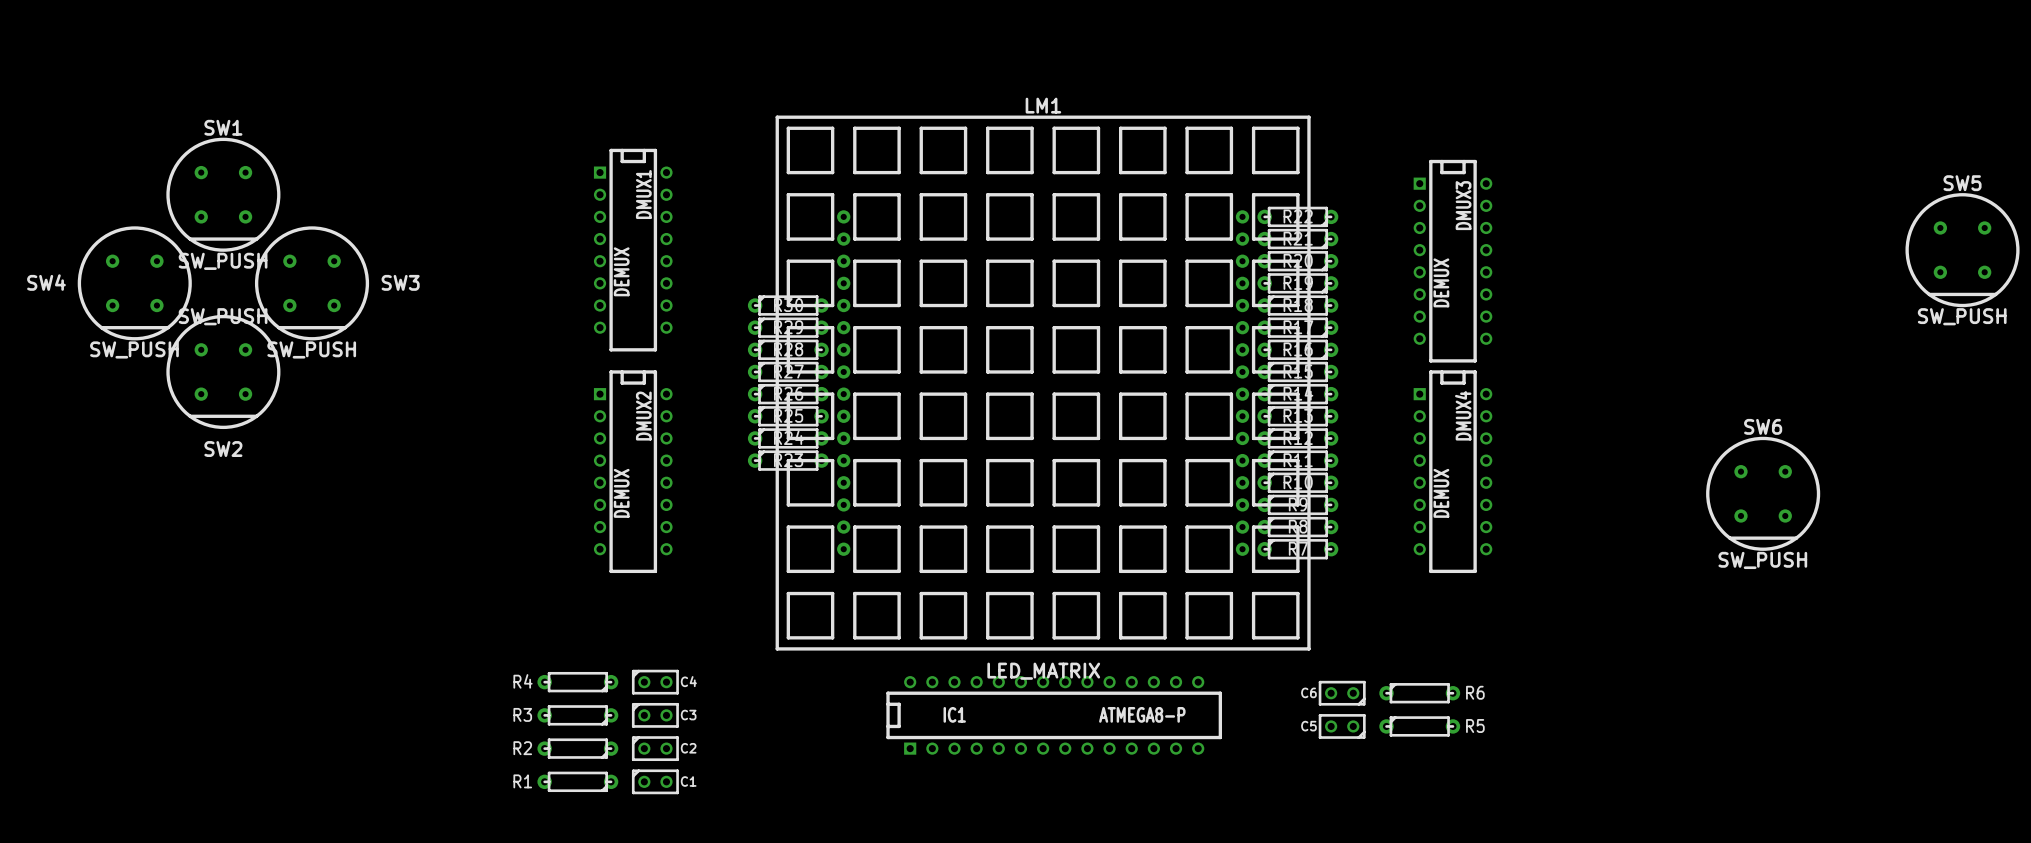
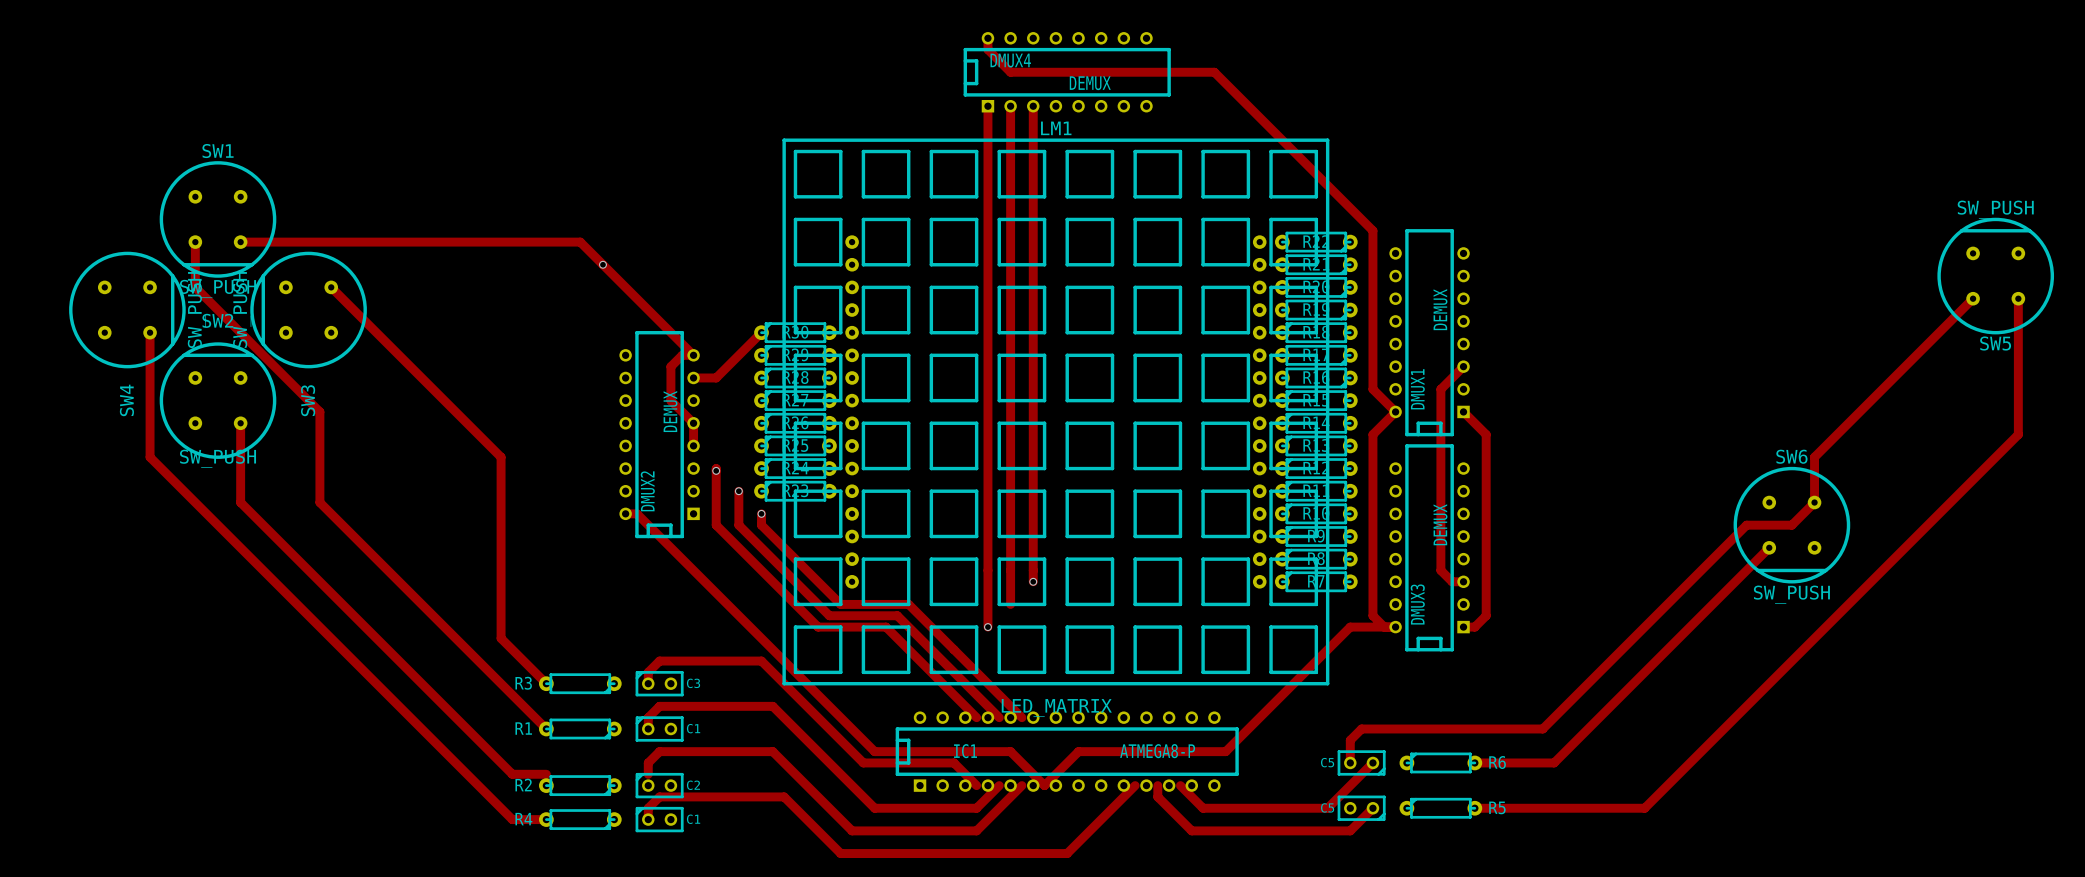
track: none -> (987, 38) (987, 49) (1010, 72) (1214, 72) (1372, 230) (1372, 389) (1395, 411) (1372, 434) (1372, 615) (1384, 627)
track: none -> (987, 106) (987, 627)
track: none -> (1010, 106) (1010, 604)
track: none -> (1033, 106) (1033, 581)
track: none -> (195, 242) (195, 287) (319, 411) (319, 502) (546, 728)
track: none -> (240, 242) (580, 242) (693, 355) (682, 355) (670, 366) (670, 400) (693, 423) (693, 445)
via: none -> (602, 264)
DMUX1 rotation: 0° (633, 250) -> 180° (1429, 332)
DMUX1 position: (633, 250) -> (1429, 332)
SW5 rotation: 0° (1962, 250) -> 180° (1995, 276)
track: none -> (331, 287) (501, 457) (501, 638) (546, 683)
DMUX3 rotation: 0° (1452, 261) -> 180° (1429, 547)
DMUX3 position: (1452, 261) -> (1429, 547)
track: none -> (1973, 298) (1814, 457) (1814, 502) (1791, 525) (1746, 525) (1542, 728) (1361, 728) (1350, 740) (1350, 762)
track: none -> (2018, 298) (2018, 434) (1644, 808) (1474, 808)
SW4 rotation: 0° (134, 283) -> 90° counterclockwise (127, 310)
SW3 rotation: 0° (312, 283) -> 90° clockwise (308, 310)
track: none -> (150, 332) (150, 457) (512, 819) (546, 819)
track: none -> (761, 332) (716, 377) (693, 377)
track: none -> (1463, 366) (1440, 389) (1440, 570) (1452, 581) (1463, 581)
SW2 rotation: 0° (223, 371) -> 180° (218, 400)
track: none -> (1463, 411) (1486, 434) (1486, 615) (1474, 627) (1463, 627)
track: none -> (240, 423) (240, 502) (512, 774) (546, 774)
track: none -> (716, 468) (716, 525) (818, 627) (886, 627) (976, 717)
via: none -> (716, 470)
track: none -> (738, 491) (738, 525) (829, 615) (897, 615) (999, 717)
via: none -> (738, 491)
DMUX2 rotation: 0° (633, 471) -> 180° (659, 434)
DMUX4 rotation: 0° (1452, 471) -> 90° counterclockwise (1067, 72)
DMUX4 position: (1452, 471) -> (1067, 72)
track: none -> (625, 513) (636, 513) (874, 751) (1010, 751) (1044, 785) (1078, 751) (1225, 751) (1350, 627) (1395, 627)
track: none -> (761, 513) (761, 525) (840, 604) (908, 604) (1021, 717)
via: none -> (761, 513)
track: none -> (1769, 547) (1554, 762) (1474, 762)
via: none -> (1033, 581)
via: none -> (987, 627)
track: none -> (648, 683) (648, 672) (659, 661) (761, 661) (863, 762) (953, 762) (976, 785)
R4: (577, 682) -> none
C4: (655, 682) -> none
R1: none -> (580, 728)
track: none -> (648, 728) (648, 717) (659, 706) (772, 706) (874, 808) (976, 808) (999, 785)
C1: none -> (659, 728)
C6: (1342, 693) -> none
R6: (1419, 693) -> none
R3 position: (577, 715) -> (580, 683)
C3 position: (655, 715) -> (659, 683)
track: none -> (1372, 762) (1327, 808) (1203, 808) (1180, 785)
R5 name: R5 (1475, 726) -> R6 (1497, 762)
track: none -> (648, 774) (648, 762) (659, 751) (772, 751) (852, 830) (976, 830) (1021, 785)
track: none -> (1135, 785) (1067, 853) (840, 853) (784, 796) (659, 796) (648, 808) (648, 819)
track: none -> (1157, 785) (1157, 796) (1191, 830) (1350, 830) (1372, 808)
C5: none -> (1361, 808)
R5: none -> (1440, 808)
R1 name: R1 (522, 781) -> R4 (523, 819)

